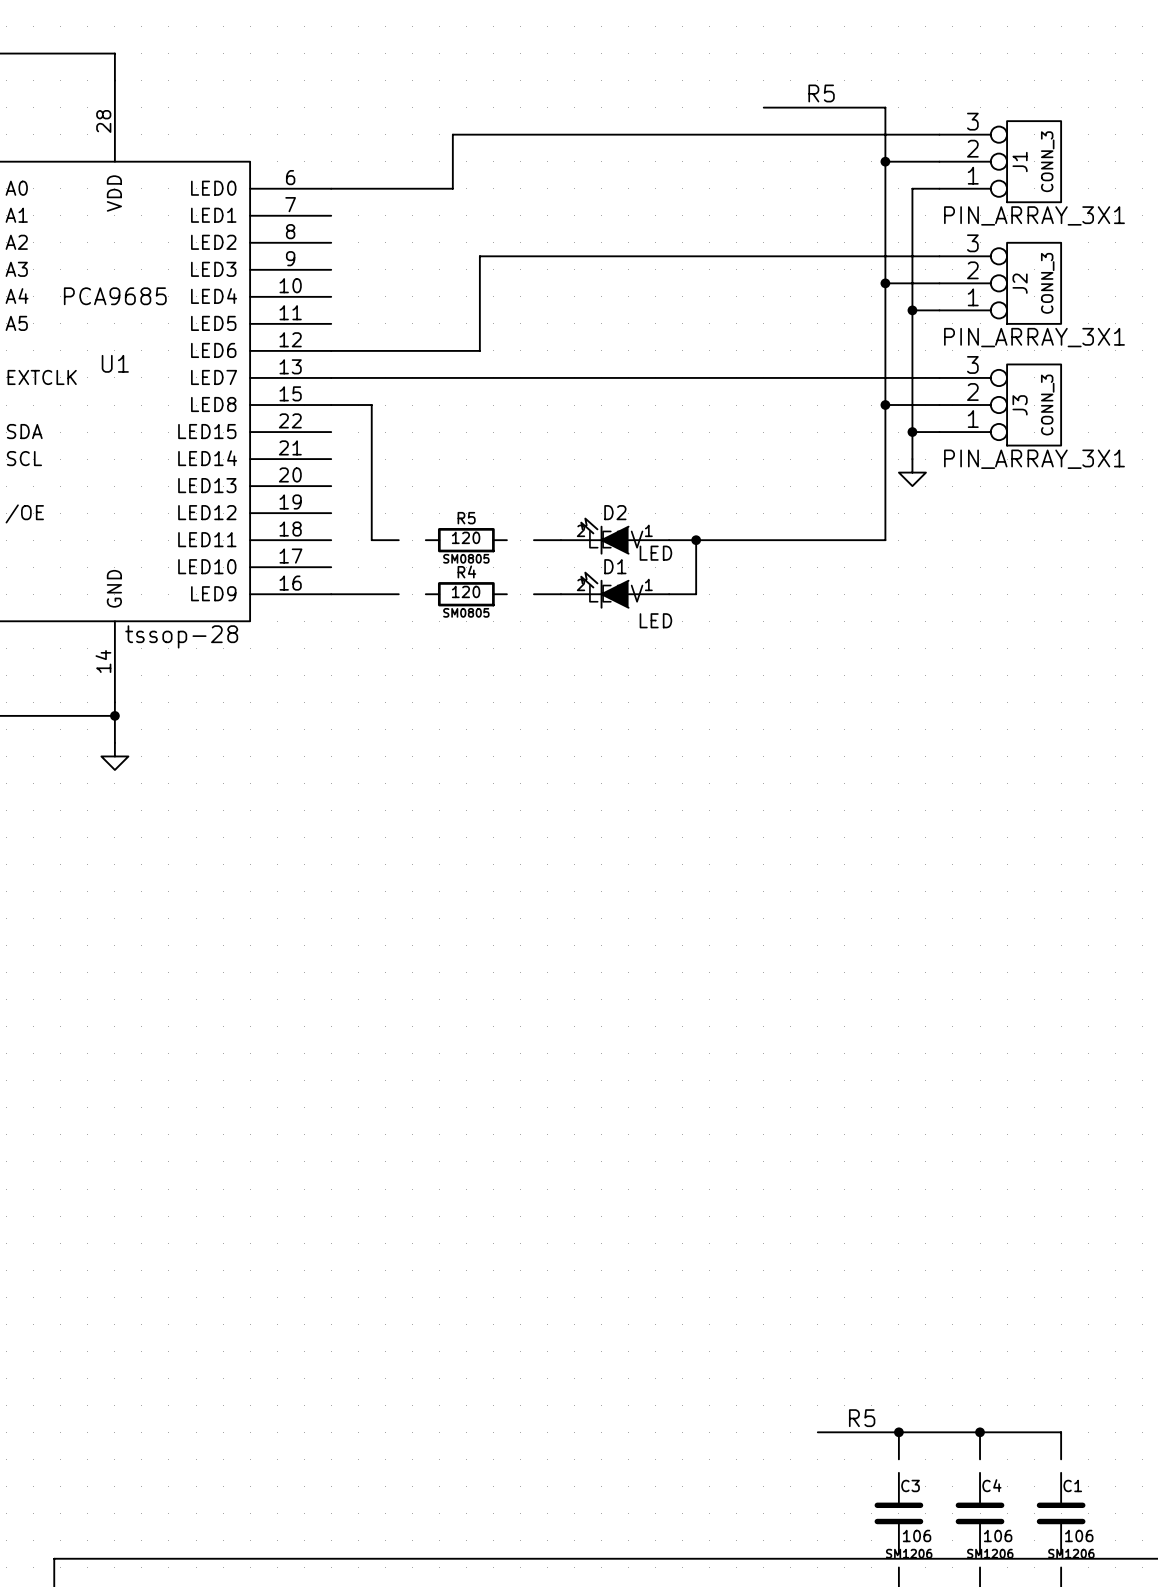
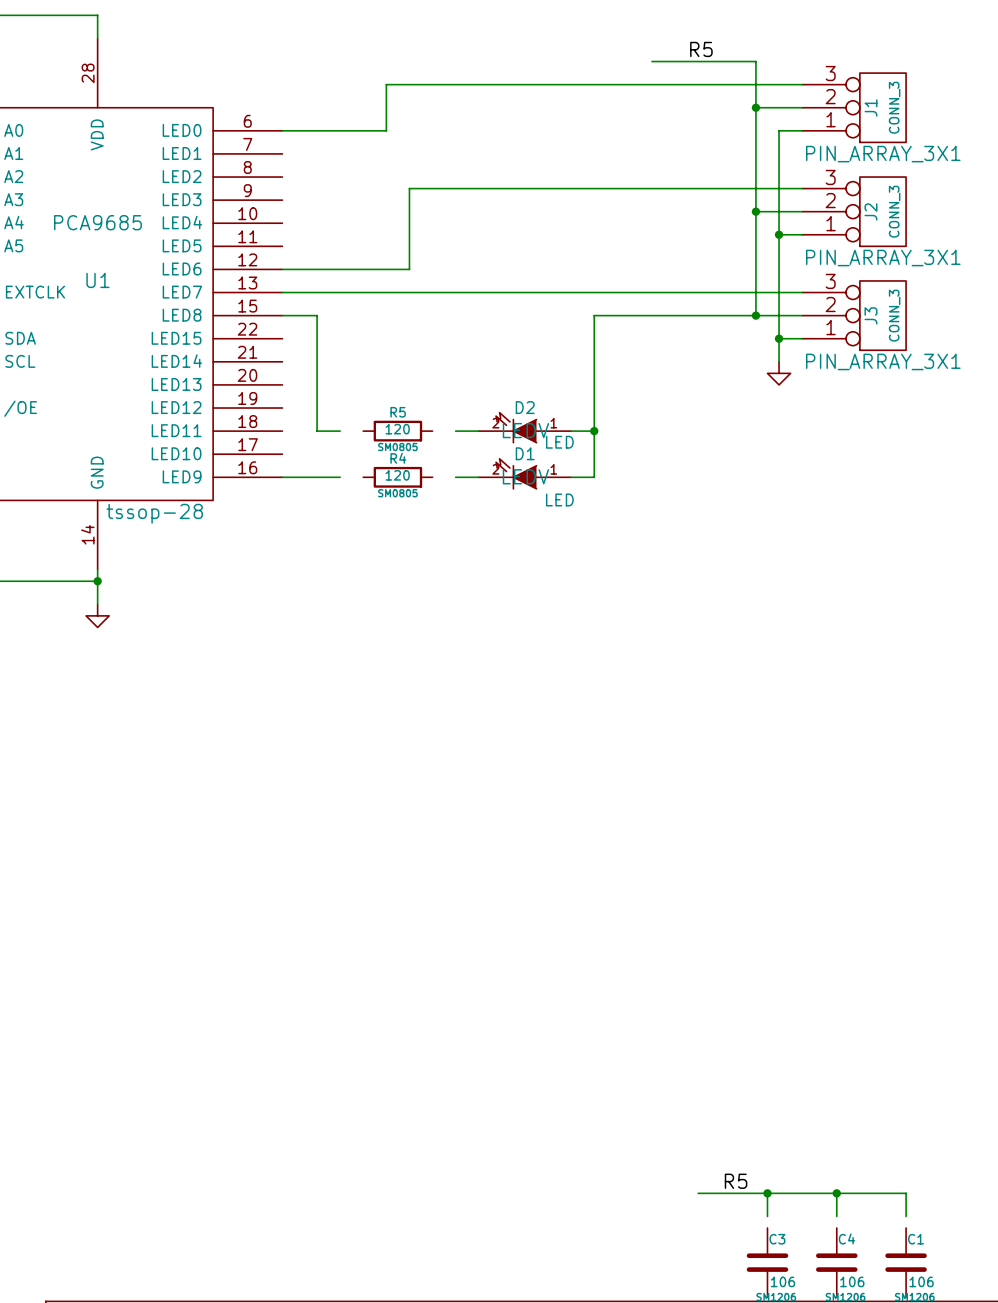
wire: (885, 405) (885, 540) (696, 540) -> (755, 315) (594, 315) (594, 431)

